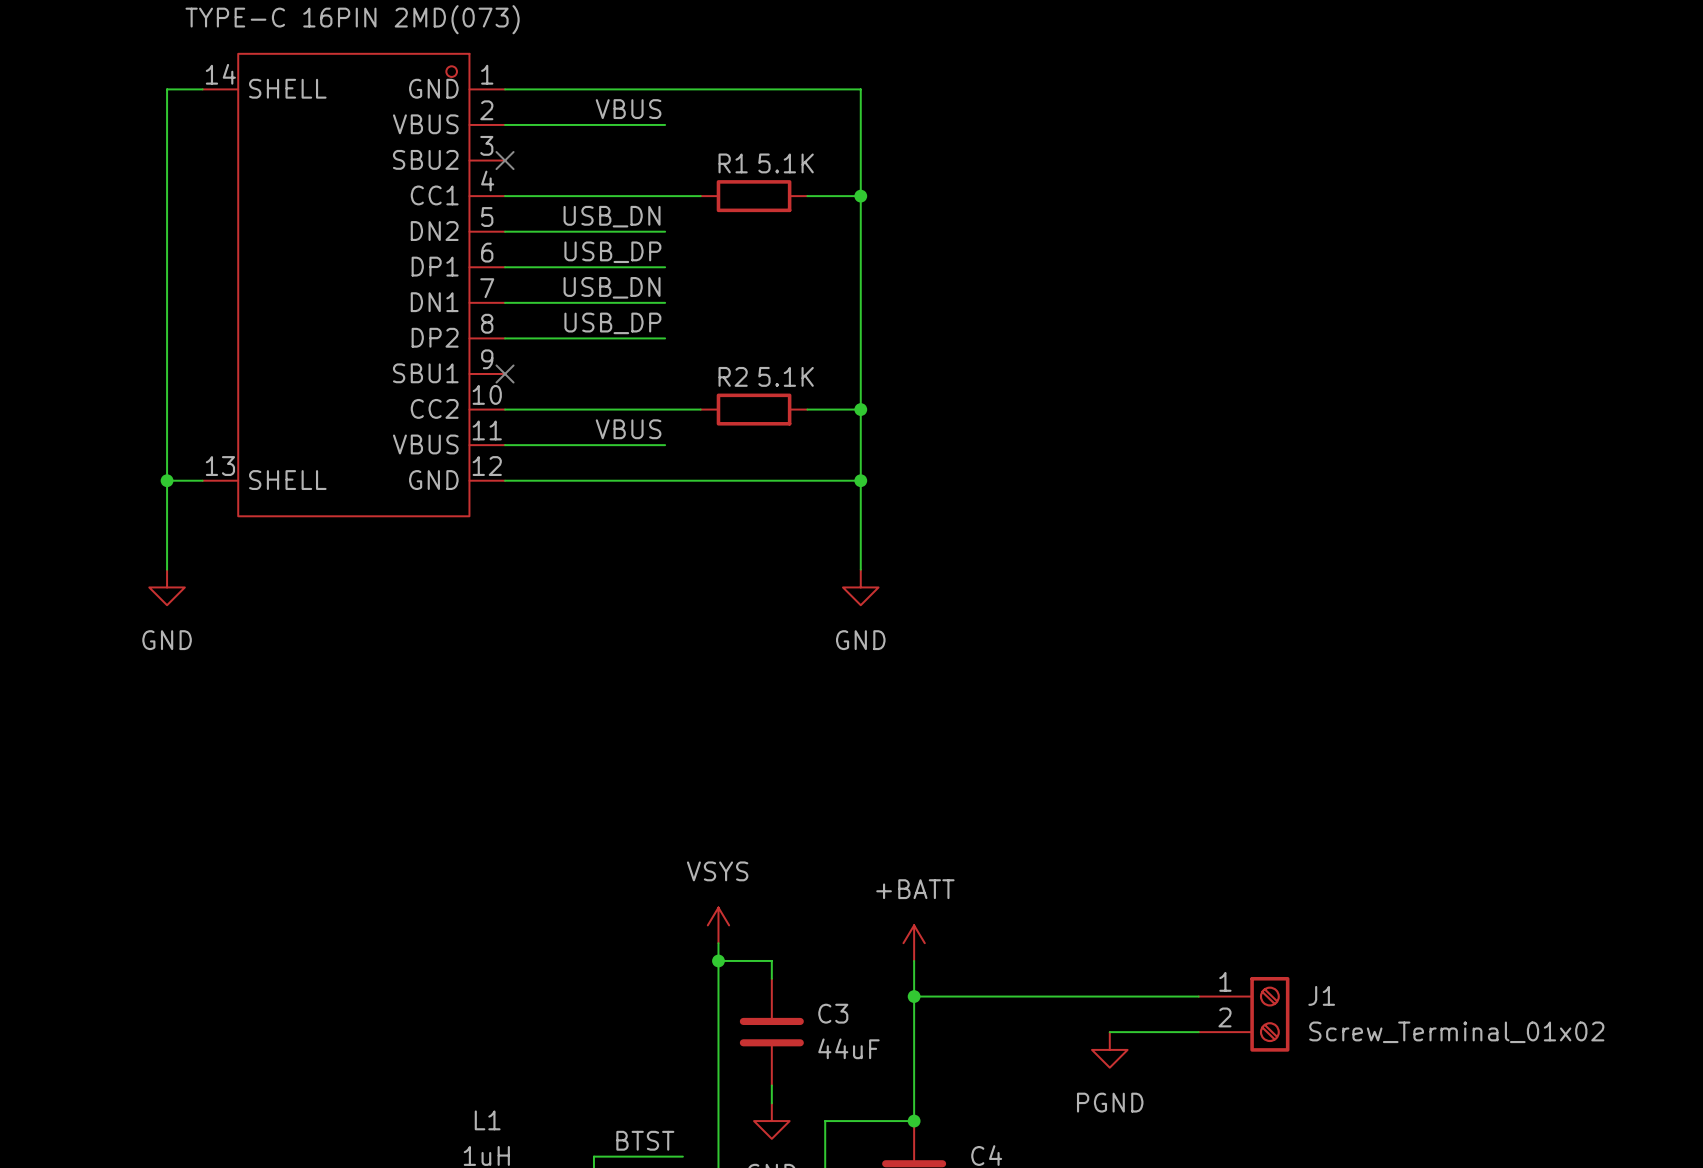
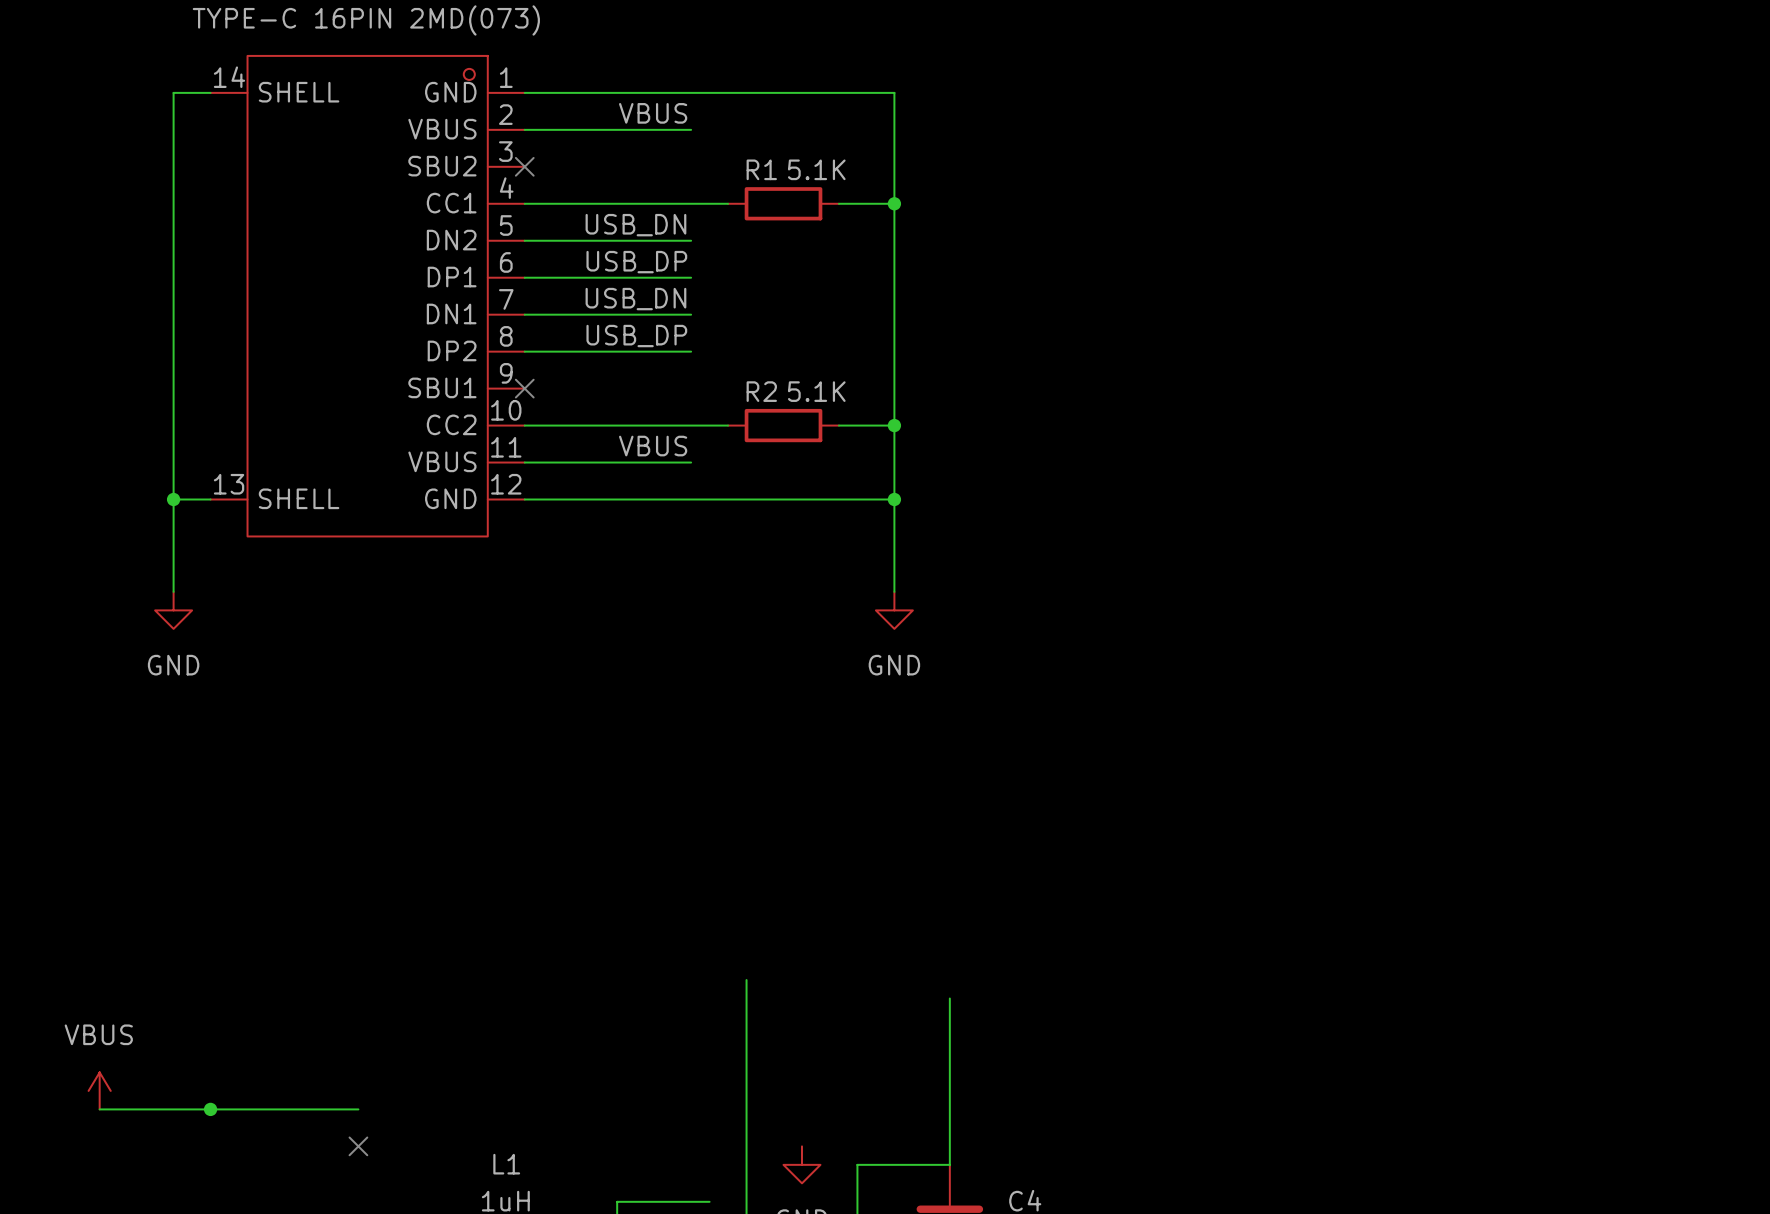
power symbol: VSYS (718, 925) -> none
power symbol: +BATT (914, 943) -> none
wire: (718, 960) (771, 960) (771, 978) -> none
junction: (718, 960) -> none
wire: (914, 996) (1198, 996) -> none
junction: (914, 996) -> none
J1: Screw_Terminal_01x02 (1244, 1014) -> none
C3: 44uF (771, 1032) -> none
wire: (1109, 1032) (1198, 1032) -> none
power symbol: none -> VBUS (99, 1090)
power symbol: PGND (1109, 1049) -> none
wire: none -> (99, 1109) (358, 1109)
junction: none -> (210, 1109)
wire: (771, 1085) (771, 1103) -> none
no-connect mark: none -> (358, 1146)
junction: (914, 1121) -> none
label: BTST (645, 1140) -> none

